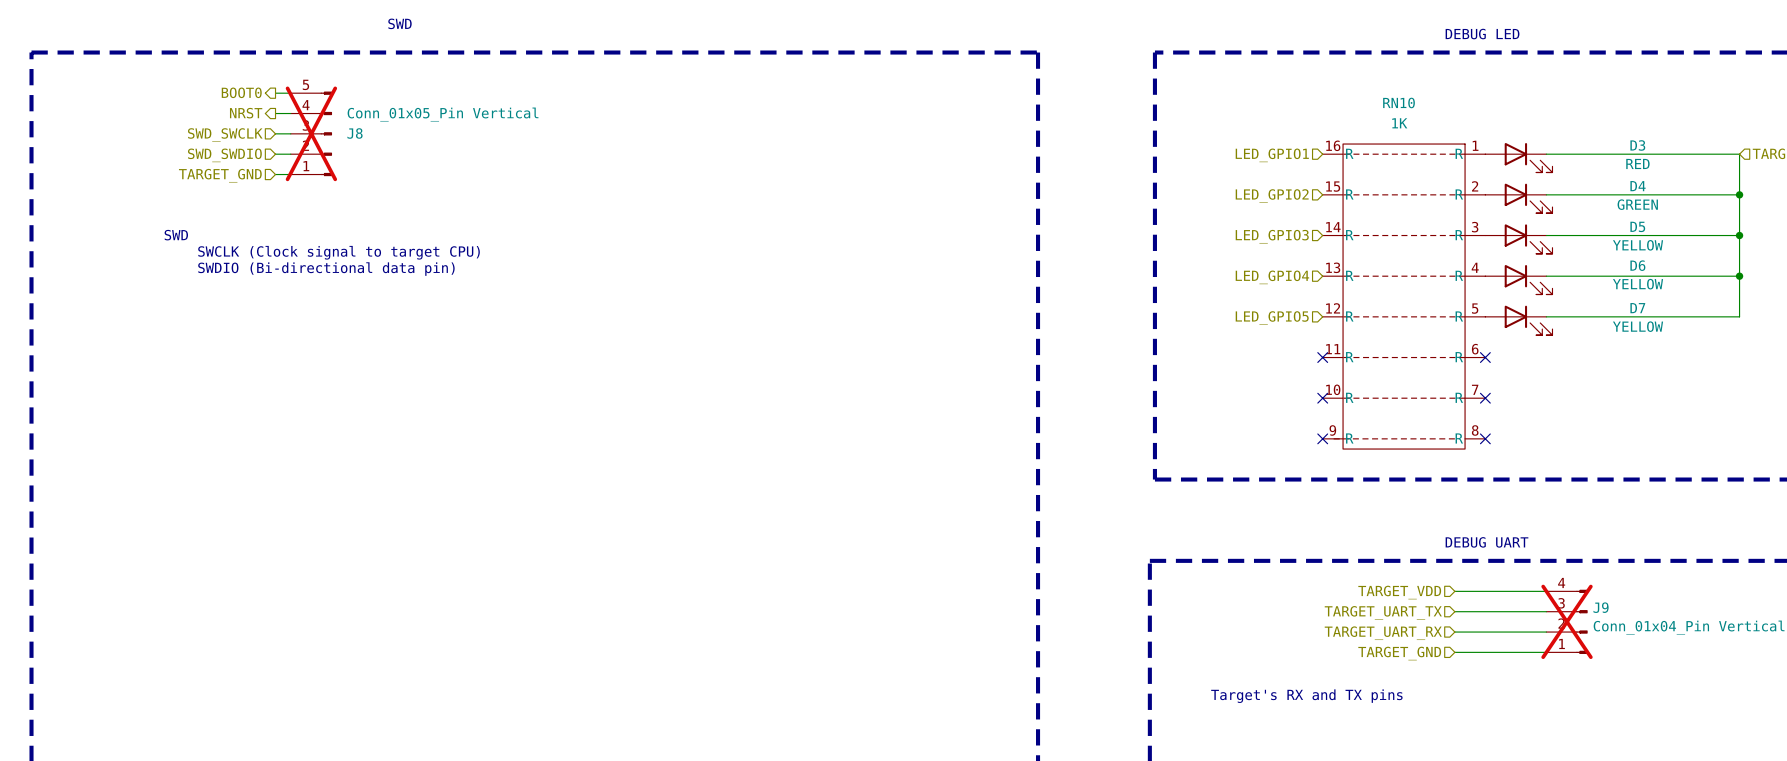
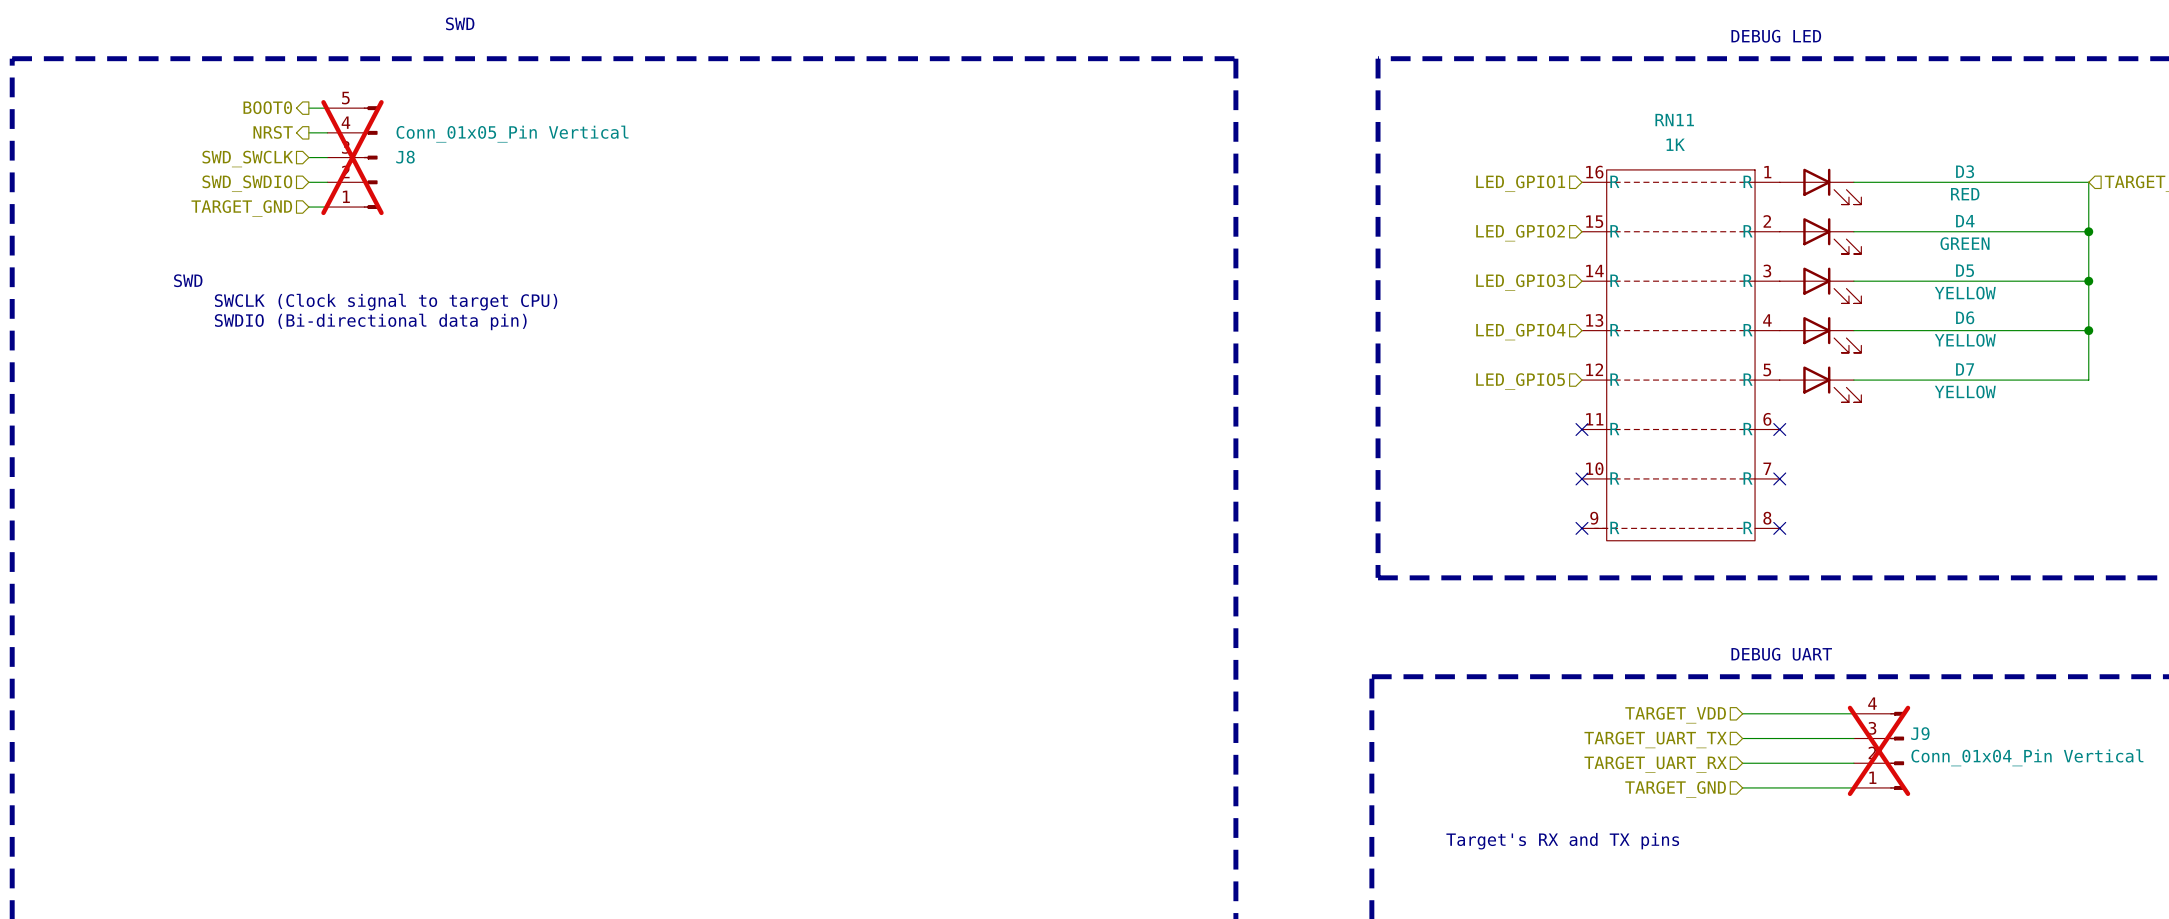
RN10 name: RN10 (1398, 102) -> RN11 (1674, 120)

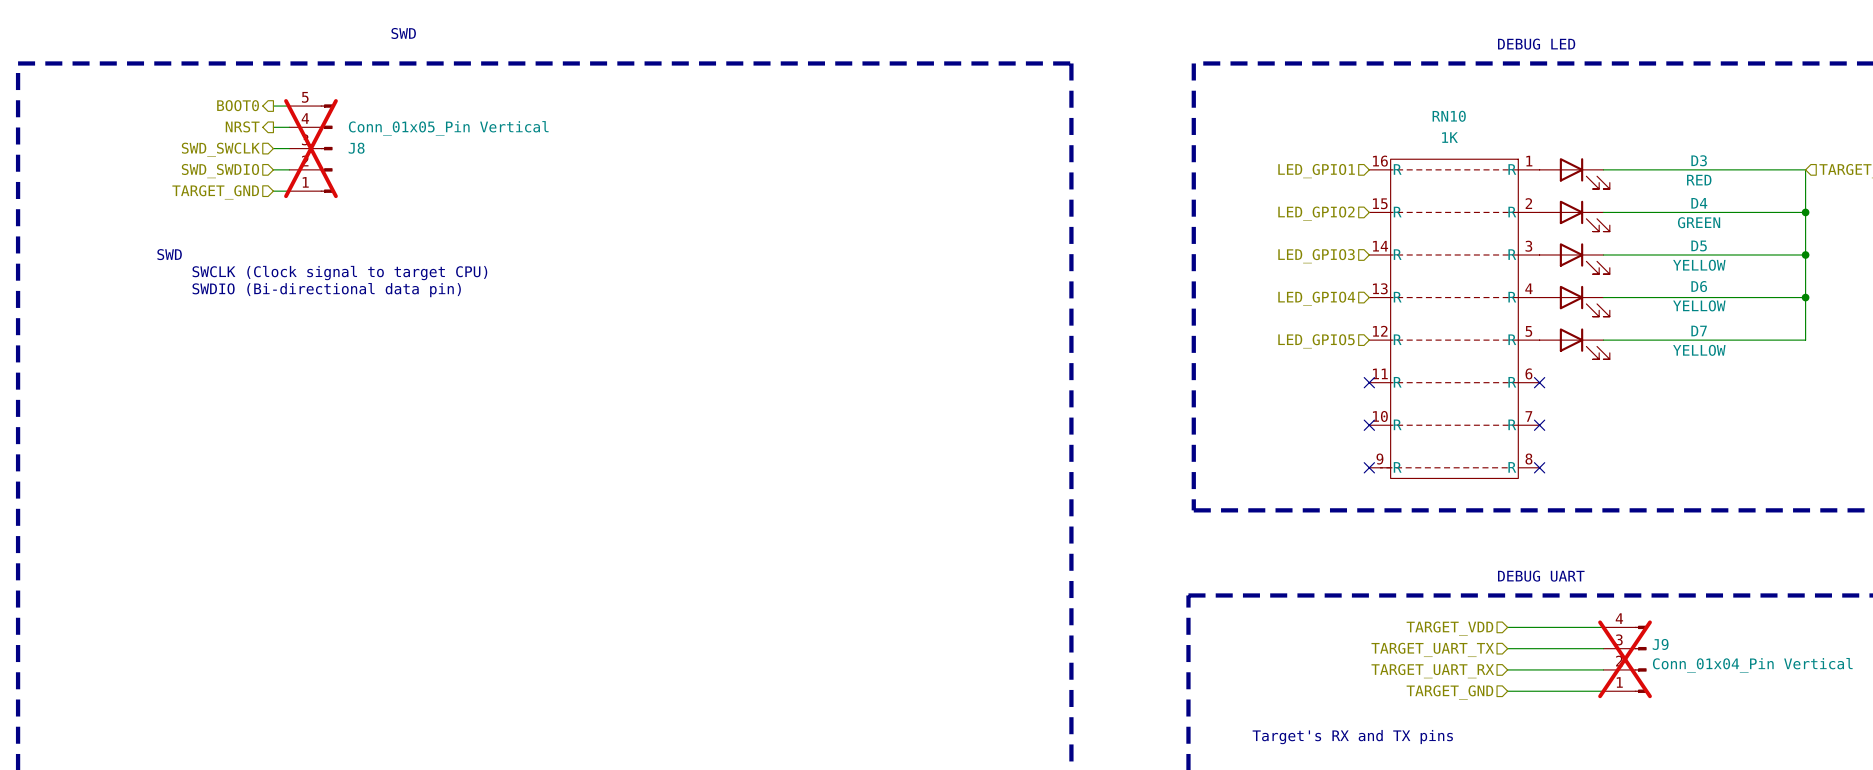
RN11 name: RN11 (1674, 120) -> RN10 (1449, 116)

